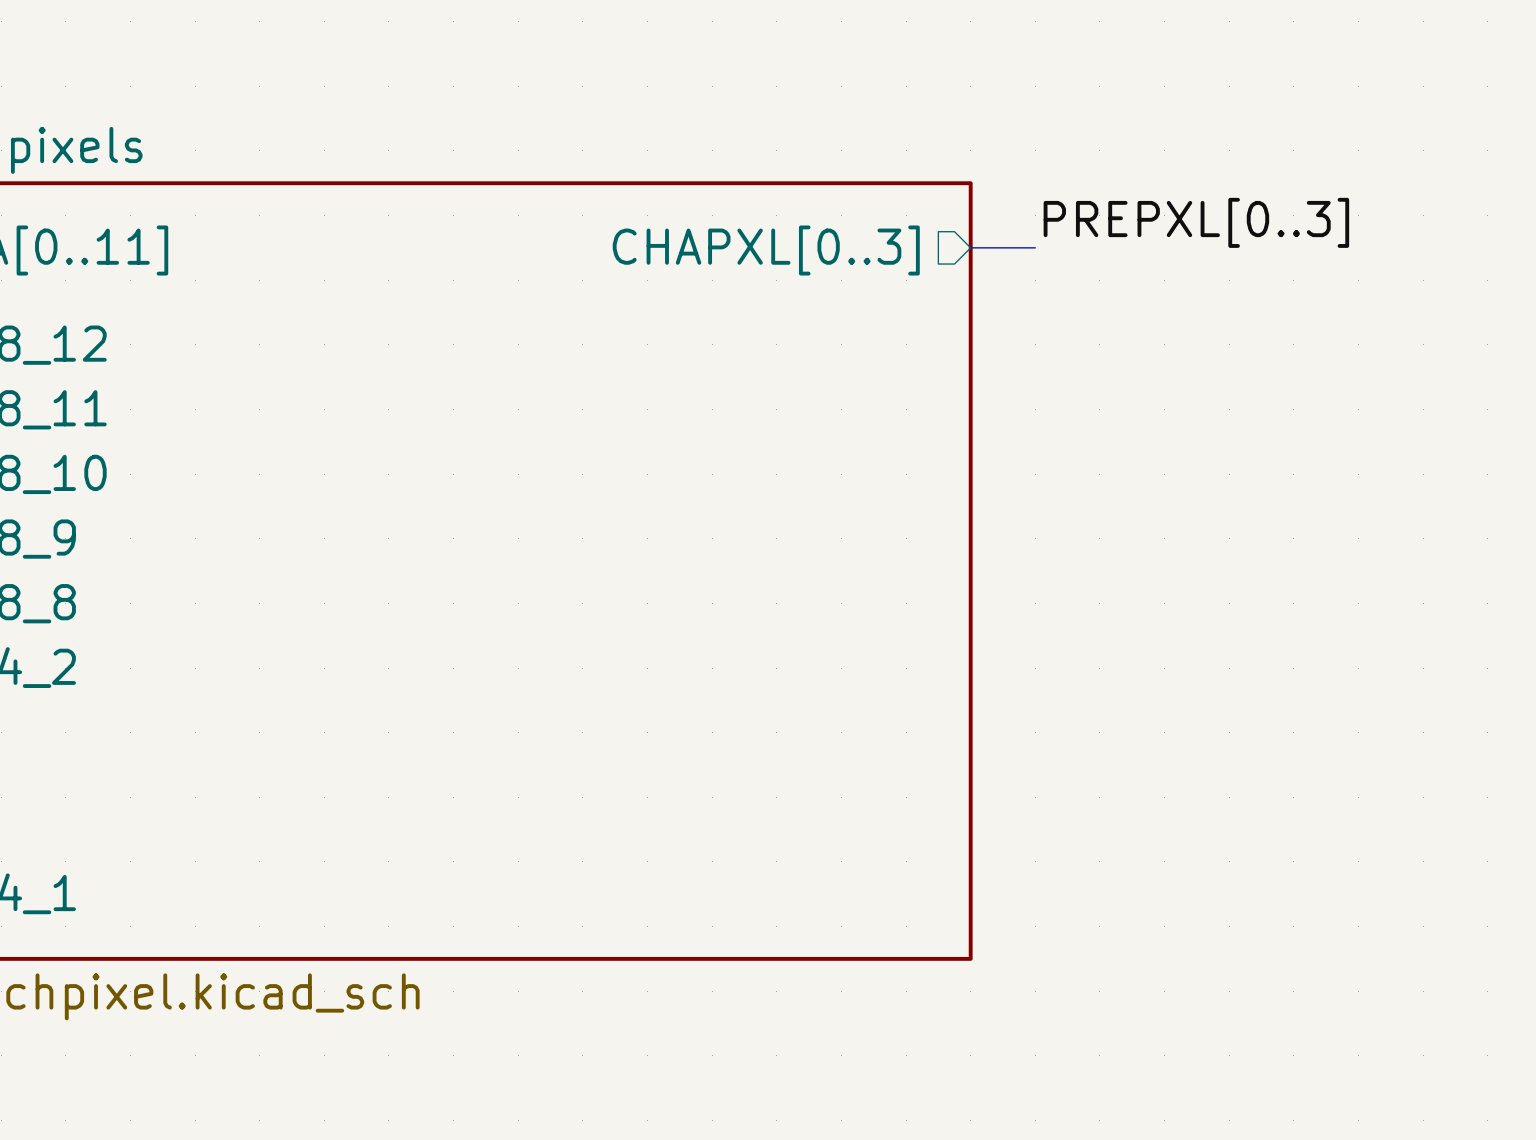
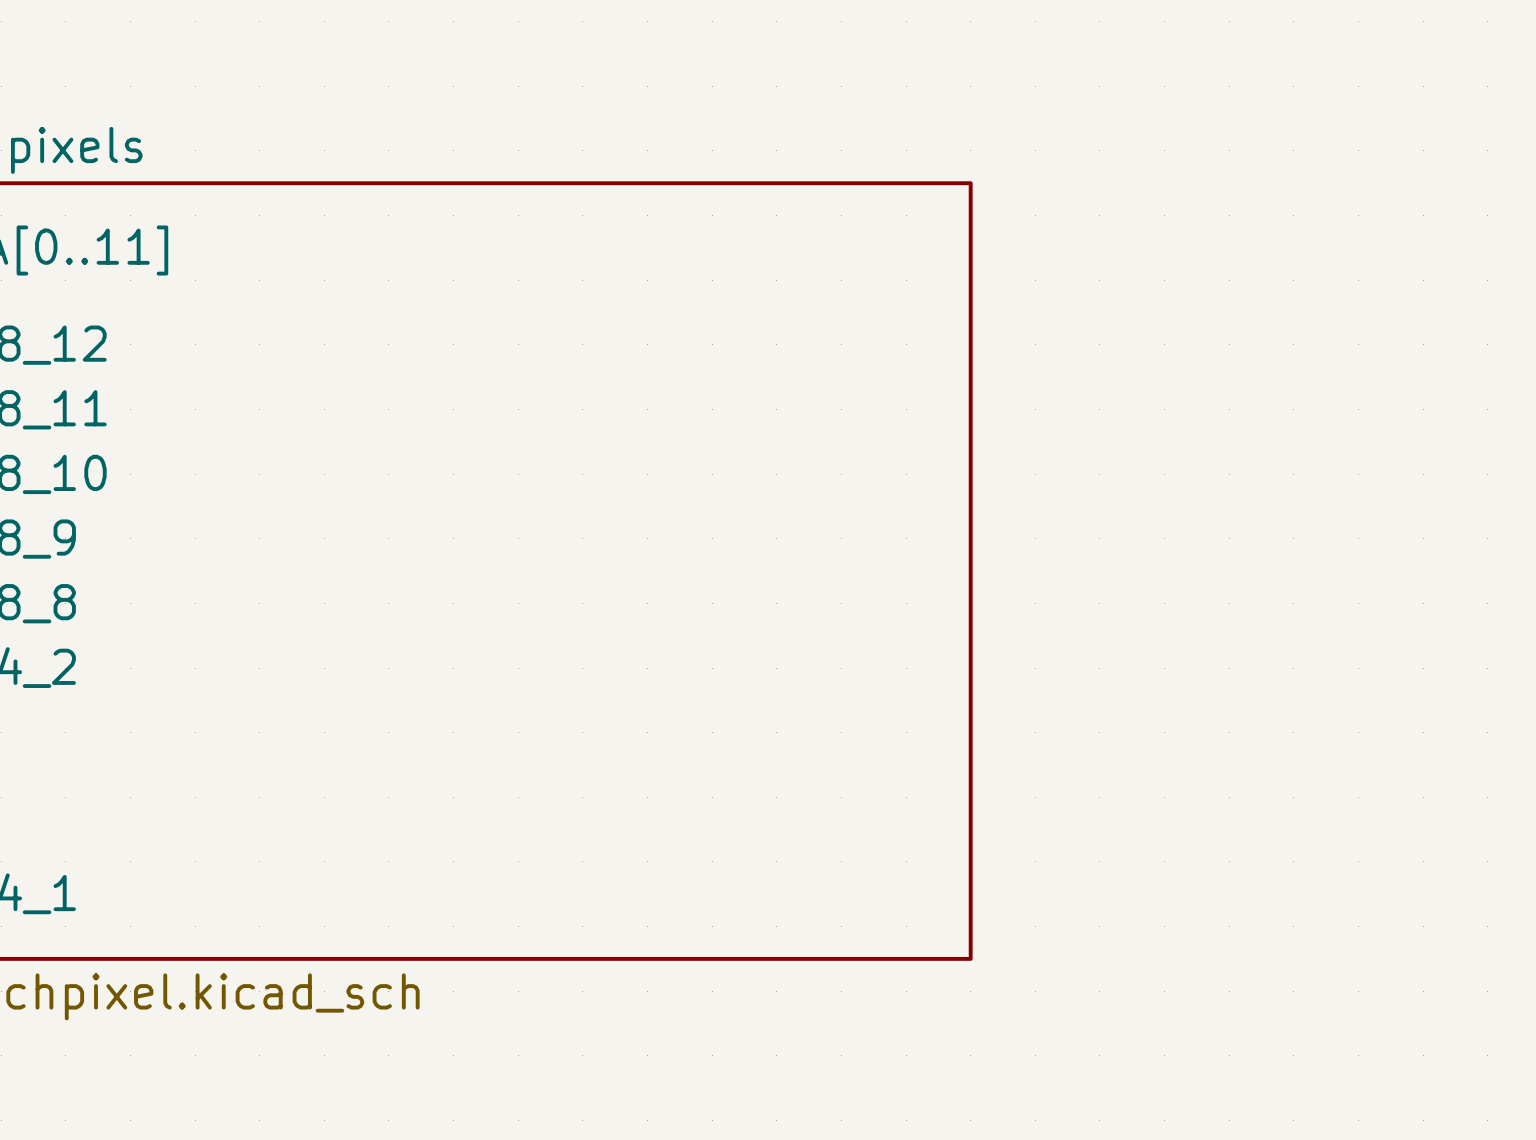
label: PREPXL[0..3] (1196, 222) -> none
bus: (970, 247) (1035, 247) -> none
sheet pin: CHAPXL[0..3] (766, 250) -> none

